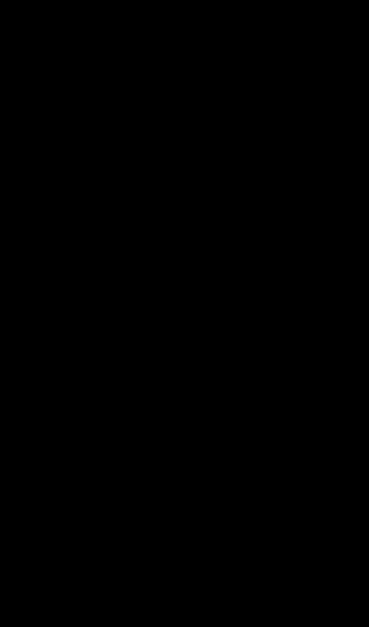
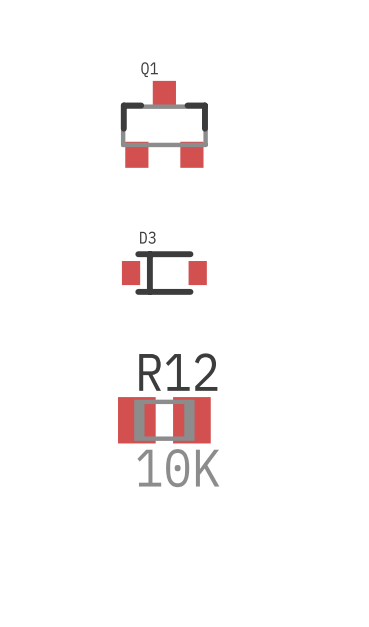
Q1: none -> (164, 124)
D3: none -> (164, 273)
R12: none -> 10K (164, 420)

